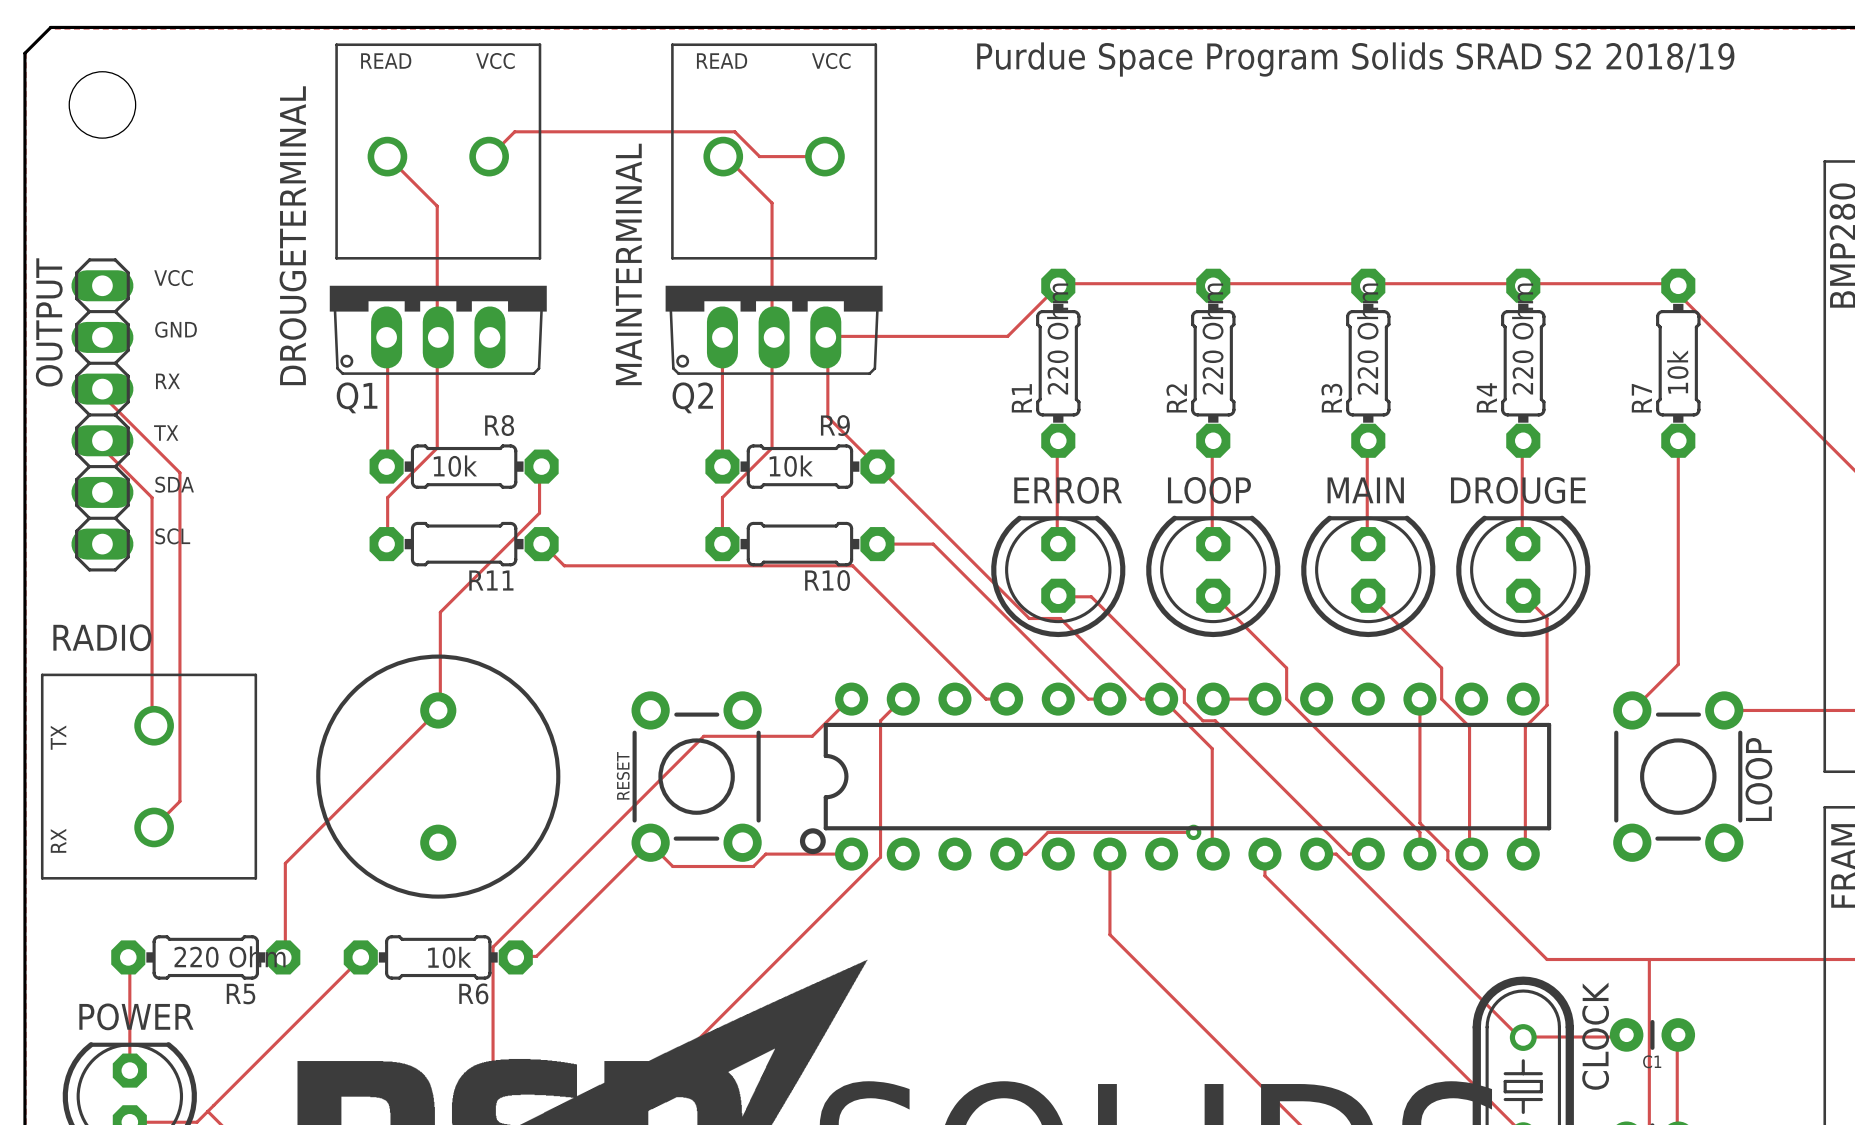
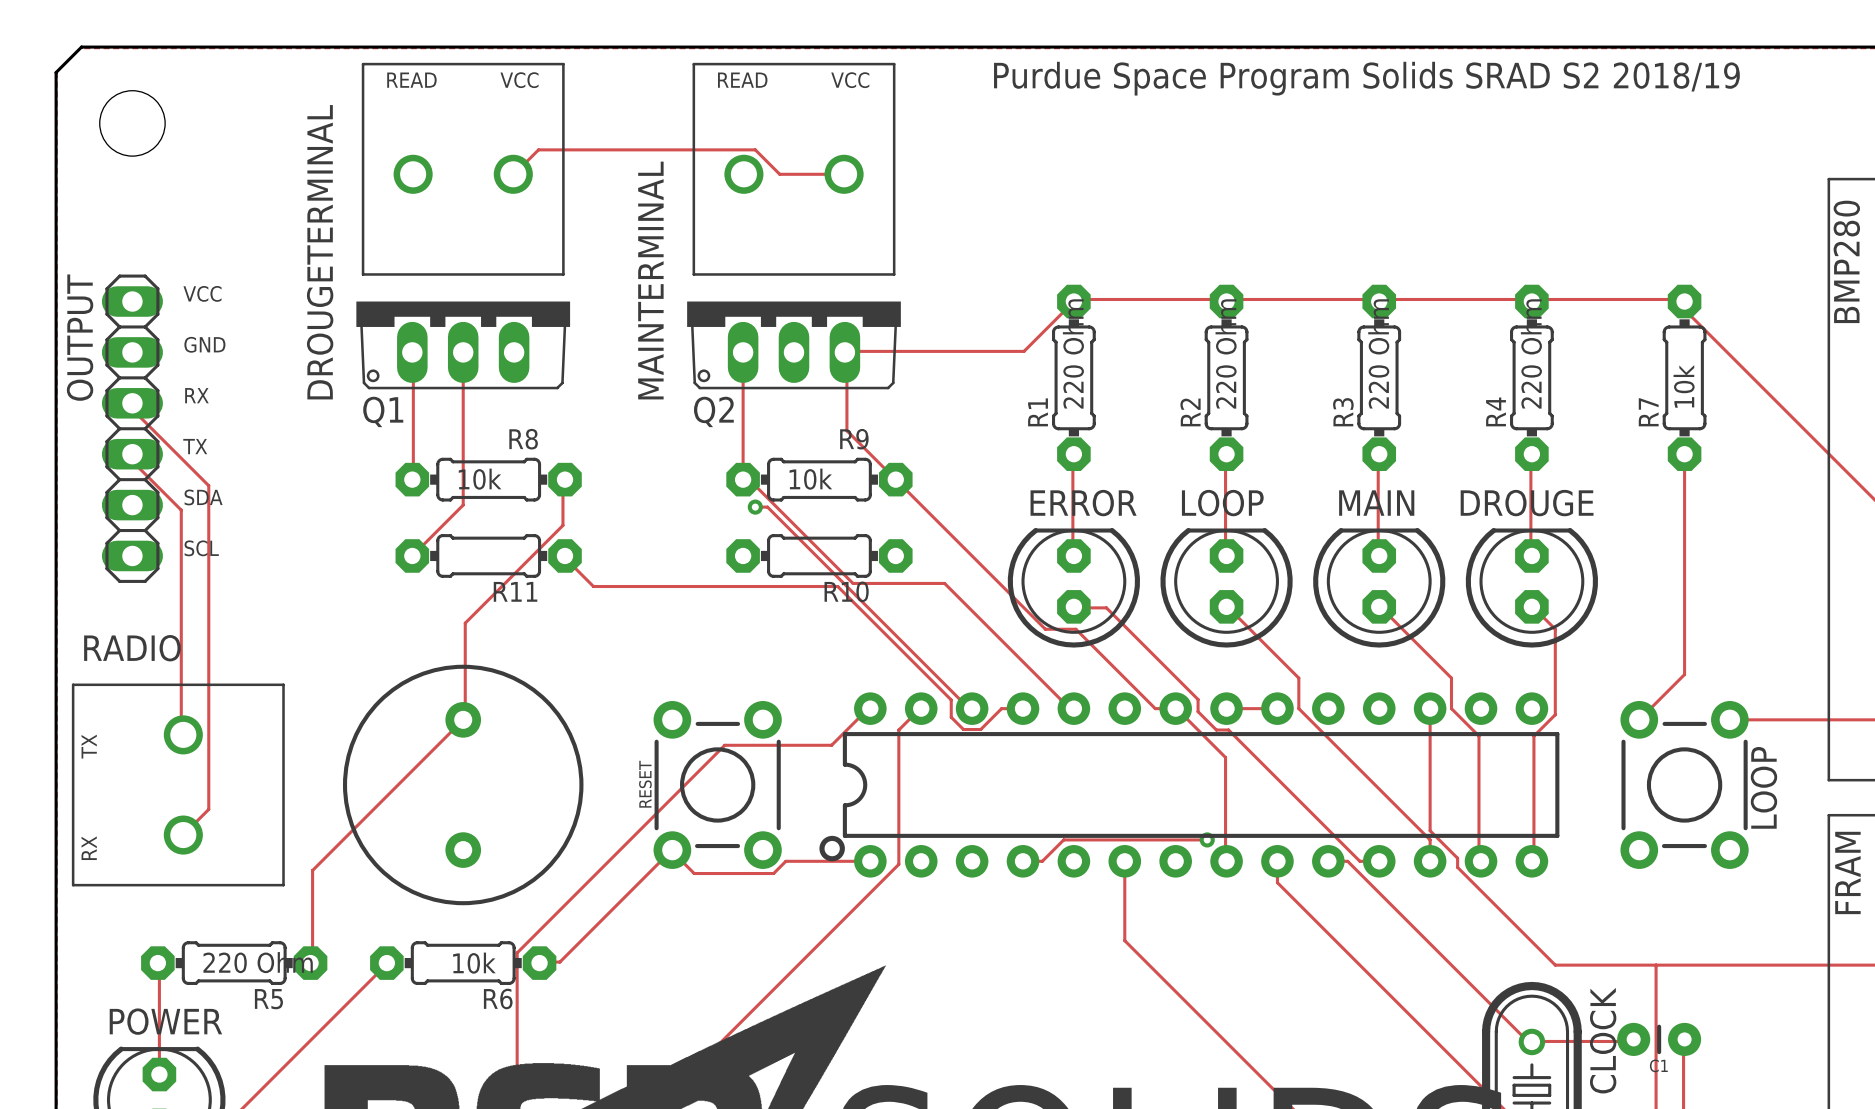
track: (387, 156) (437, 206) (438, 337) (437, 448) (387, 497) (386, 544) -> (463, 352) (463, 505) (412, 555)
track: (723, 156) (725, 156) (772, 203) (772, 336) (774, 337) (772, 339) (772, 448) (722, 497) (722, 544) -> none
track: none -> (743, 479) (749, 479) (853, 583) (944, 583) (1060, 699) (1063, 699) (1073, 708)
track: none -> (755, 507) (767, 507) (959, 699) (962, 699) (972, 708)
via: none -> (755, 507)
track: (541, 544) (564, 565) (852, 565) (985, 699) -> (565, 555) (562, 555) (593, 586) (837, 586) (951, 699) (951, 717) (963, 729) (980, 729) (1002, 708)
track: (877, 544) (933, 544) (1088, 699) (1109, 699) -> none

